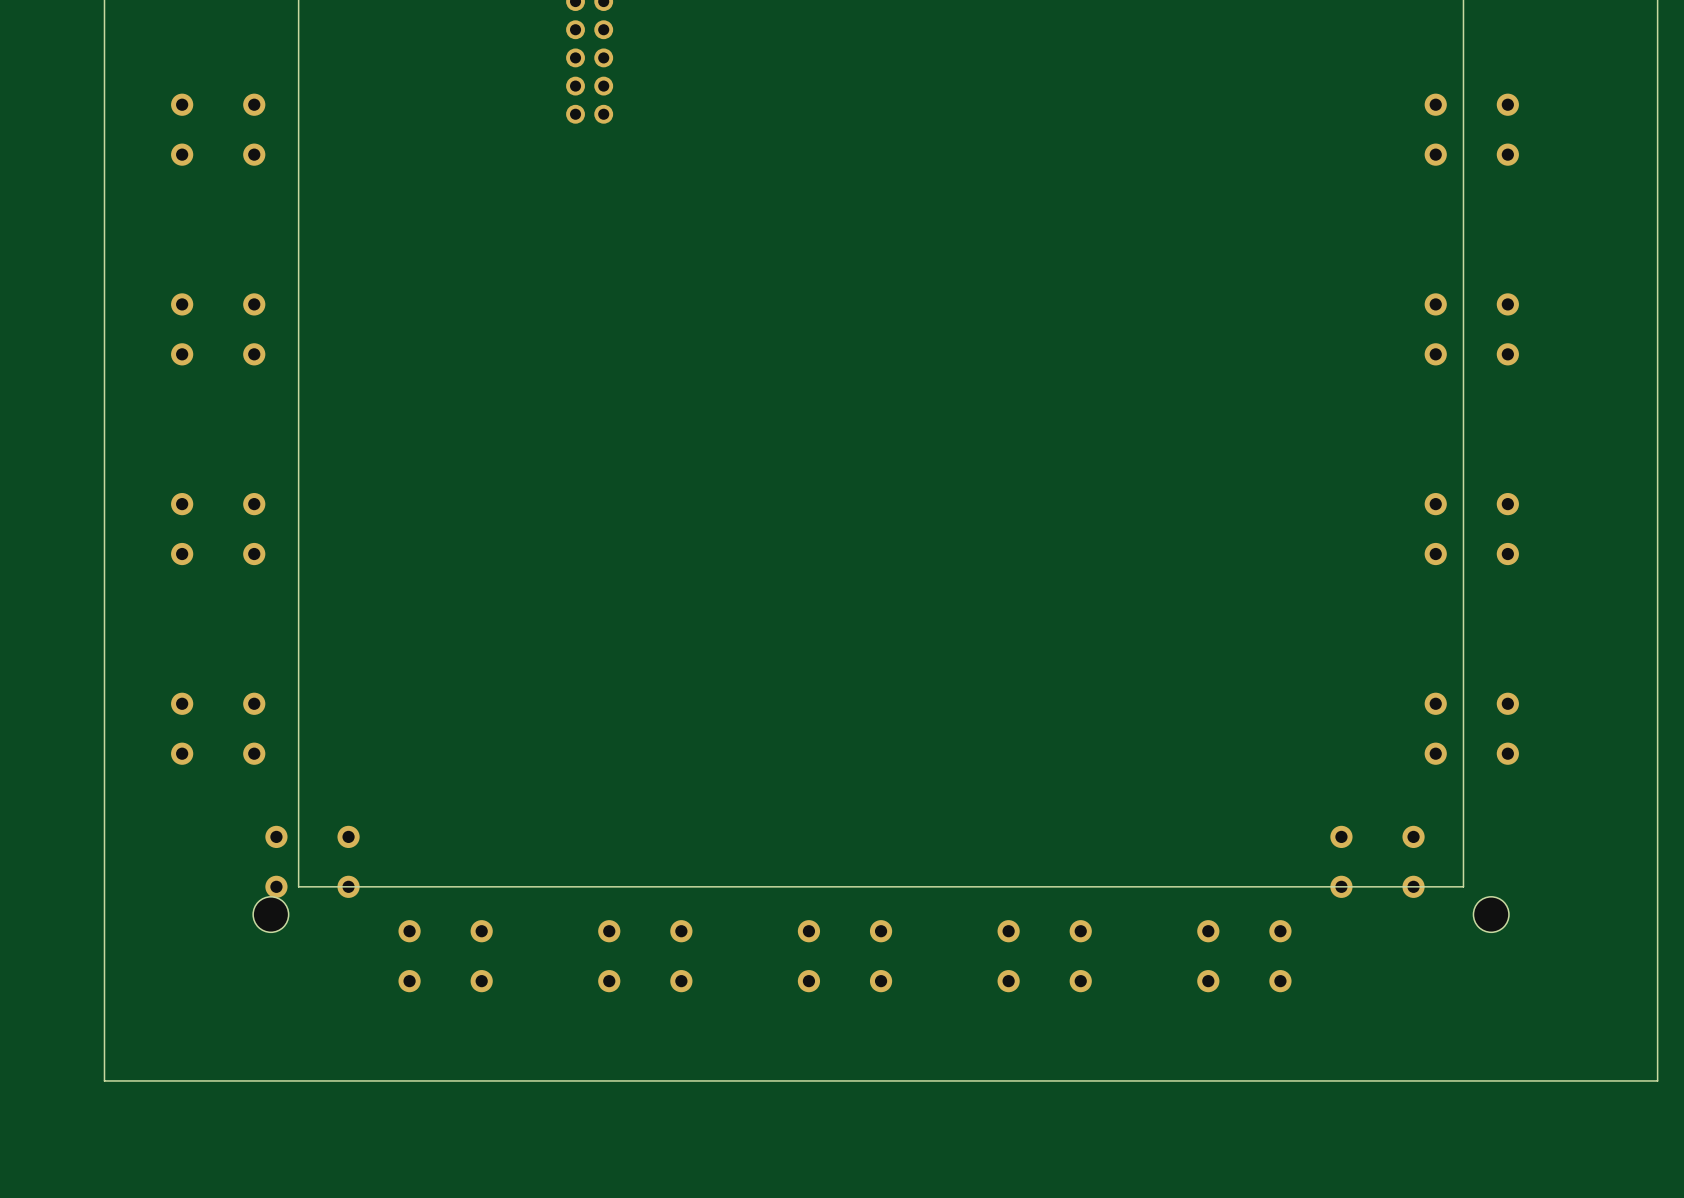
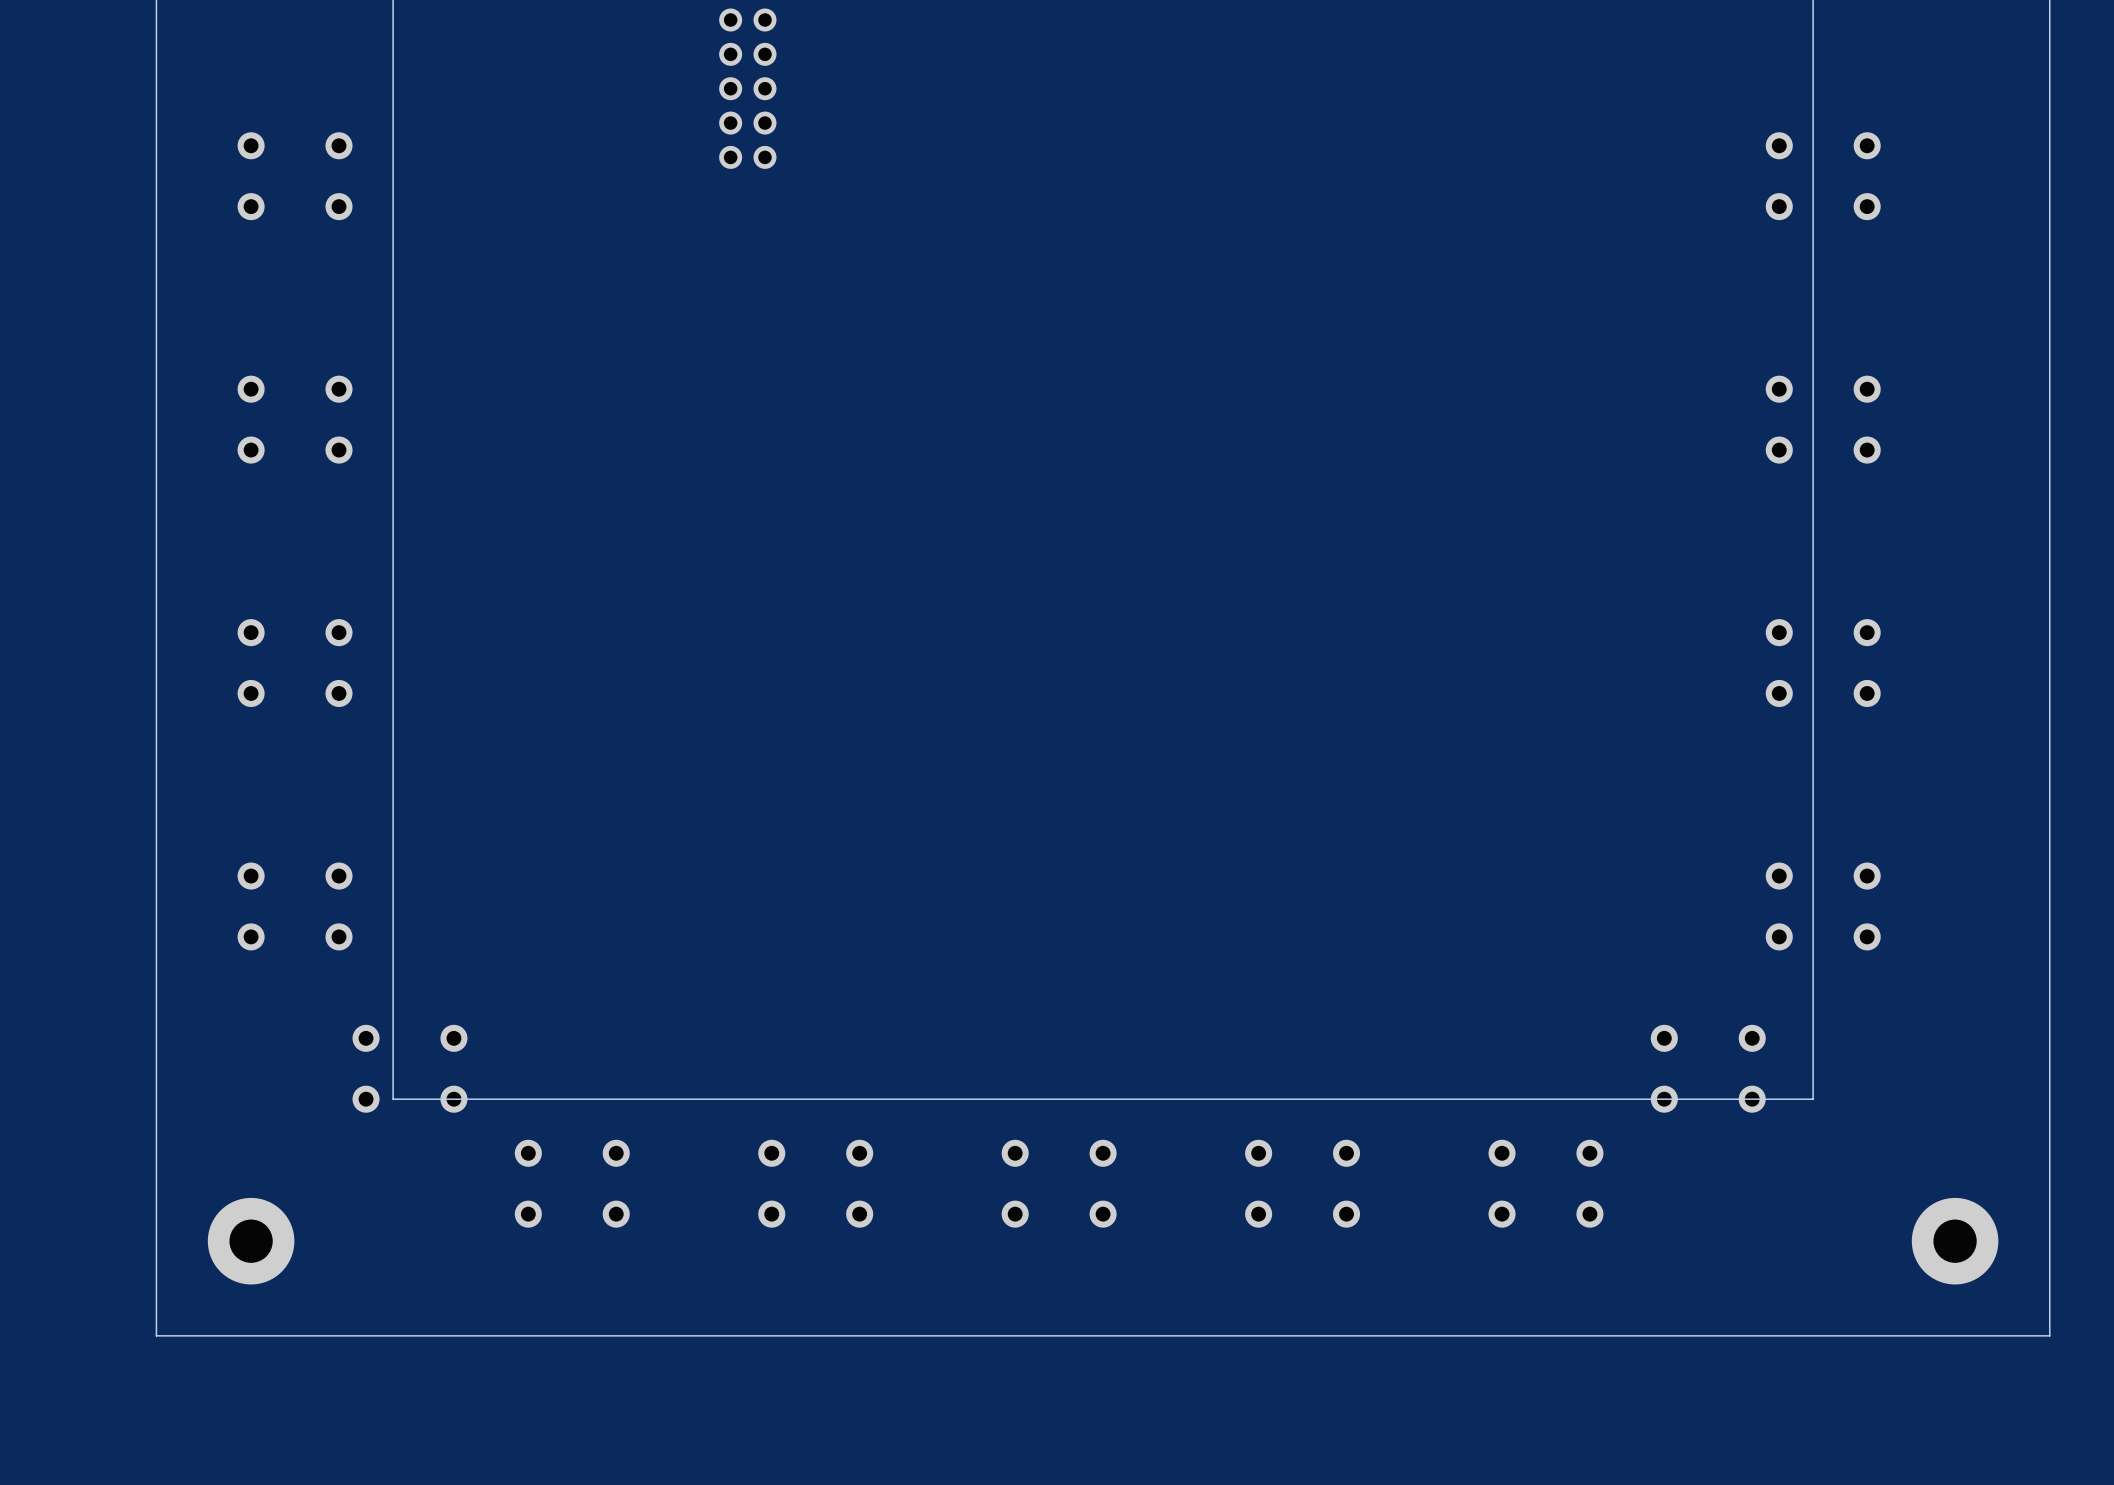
part: (270, 914) -> none
part: (1491, 914) -> none
part: none -> (251, 1241)
part: none -> (1955, 1241)

